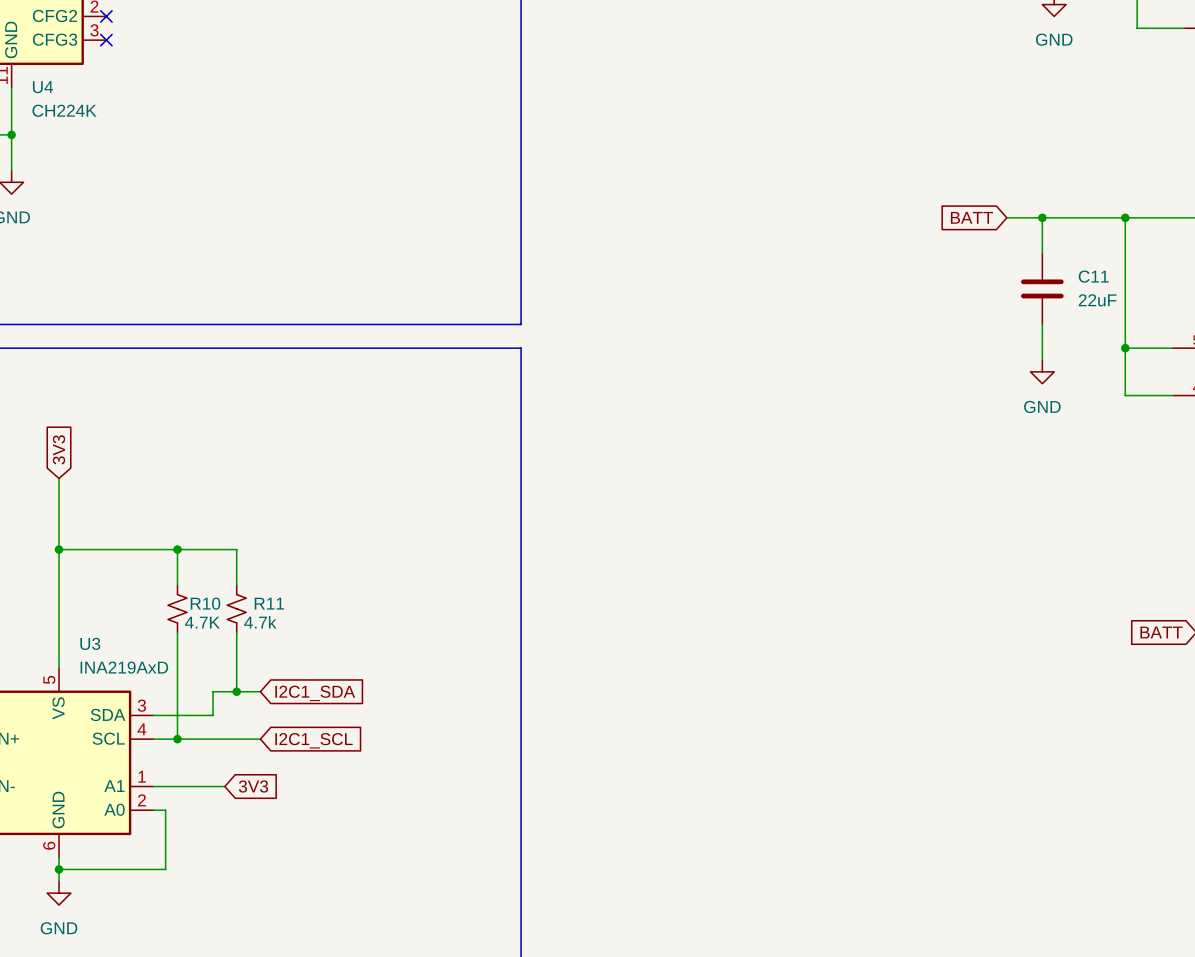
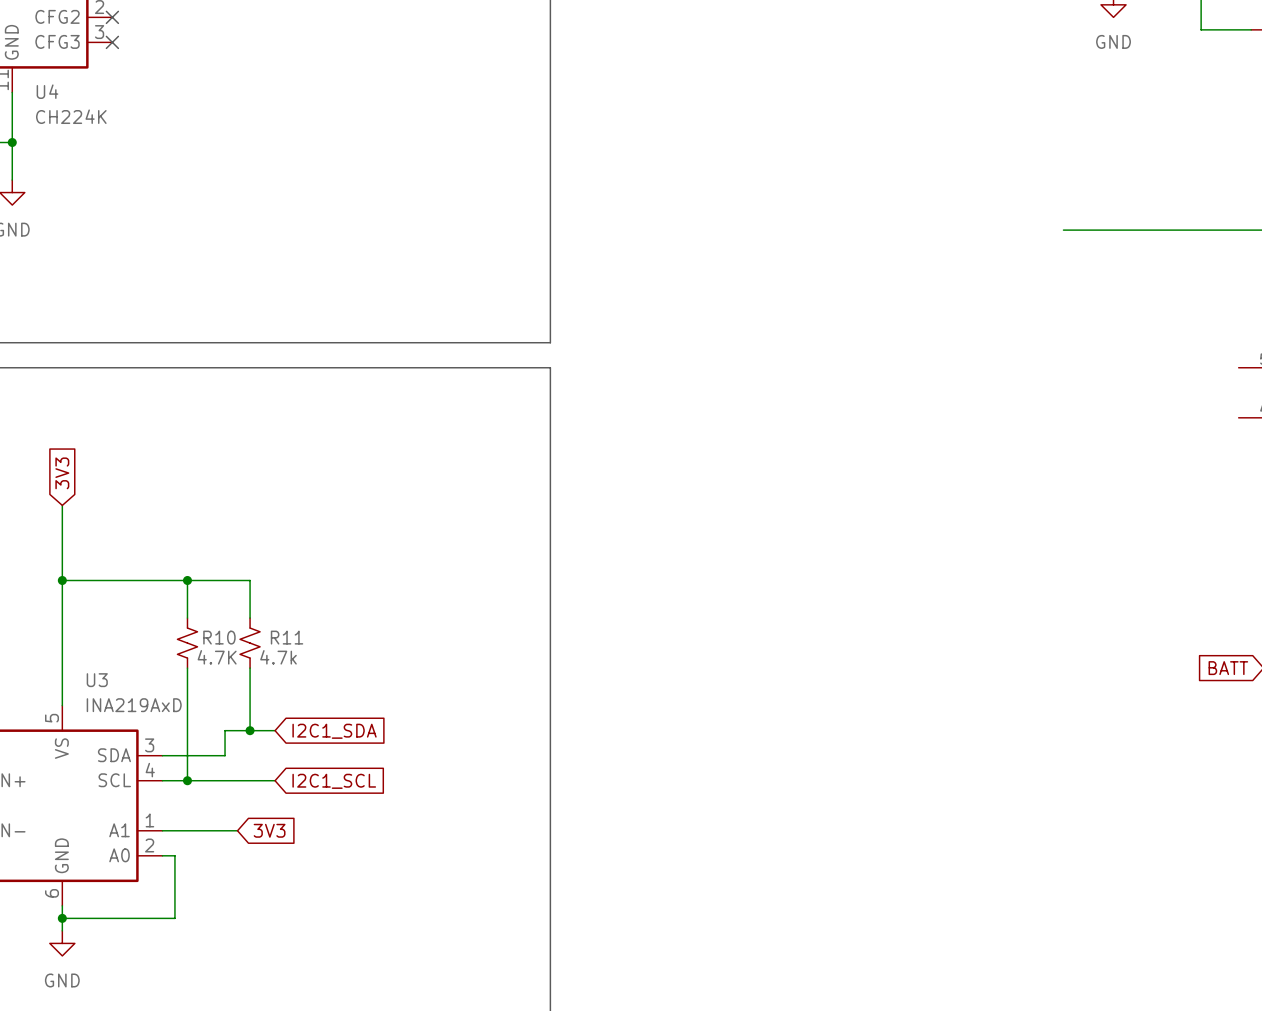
global label: BATT (971, 217) -> none
wire: (1042, 217) (1042, 253) -> none
junction: (1042, 217) -> none
wire: (1125, 217) (1125, 395) (1172, 395) -> none
junction: (1125, 217) -> none
C11: 22uF (1042, 288) -> none
wire: (1042, 324) (1042, 360) -> none
wire: (1125, 348) (1172, 348) -> none
junction: (1125, 348) -> none
power symbol: GND (1042, 371) -> none

